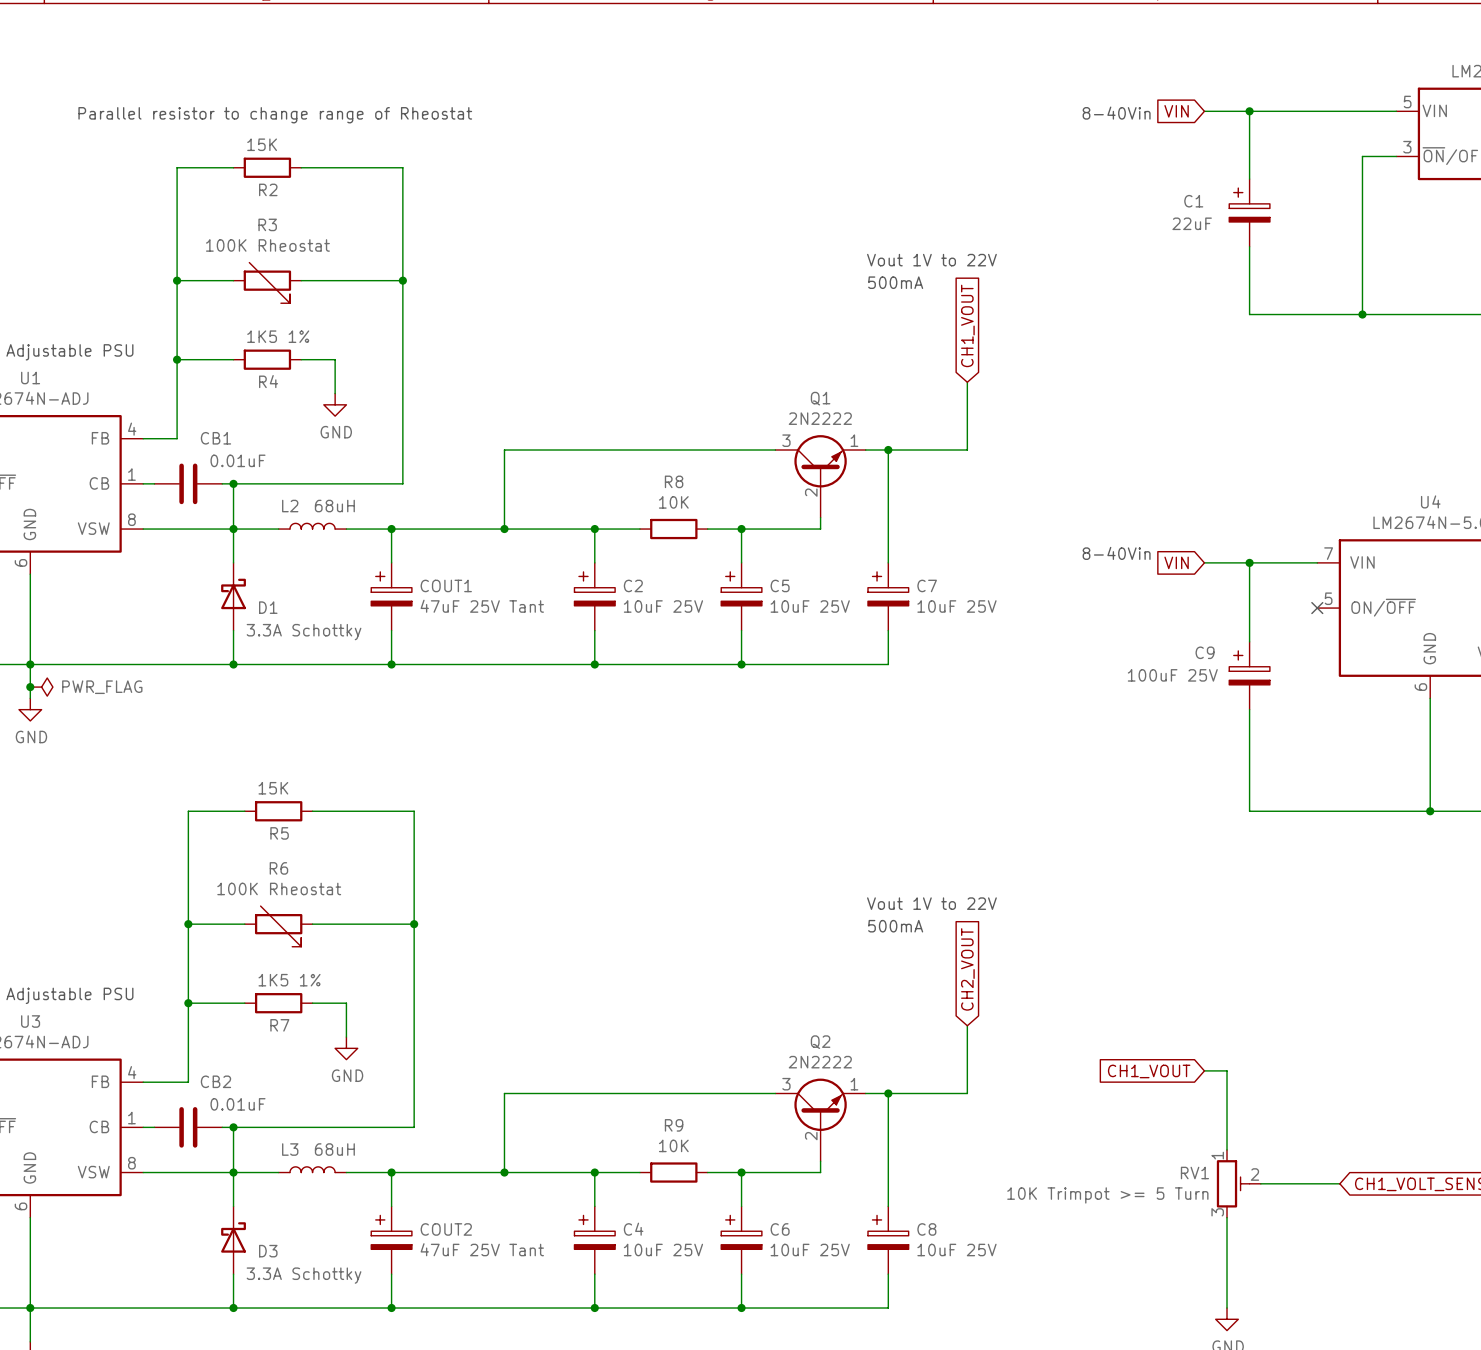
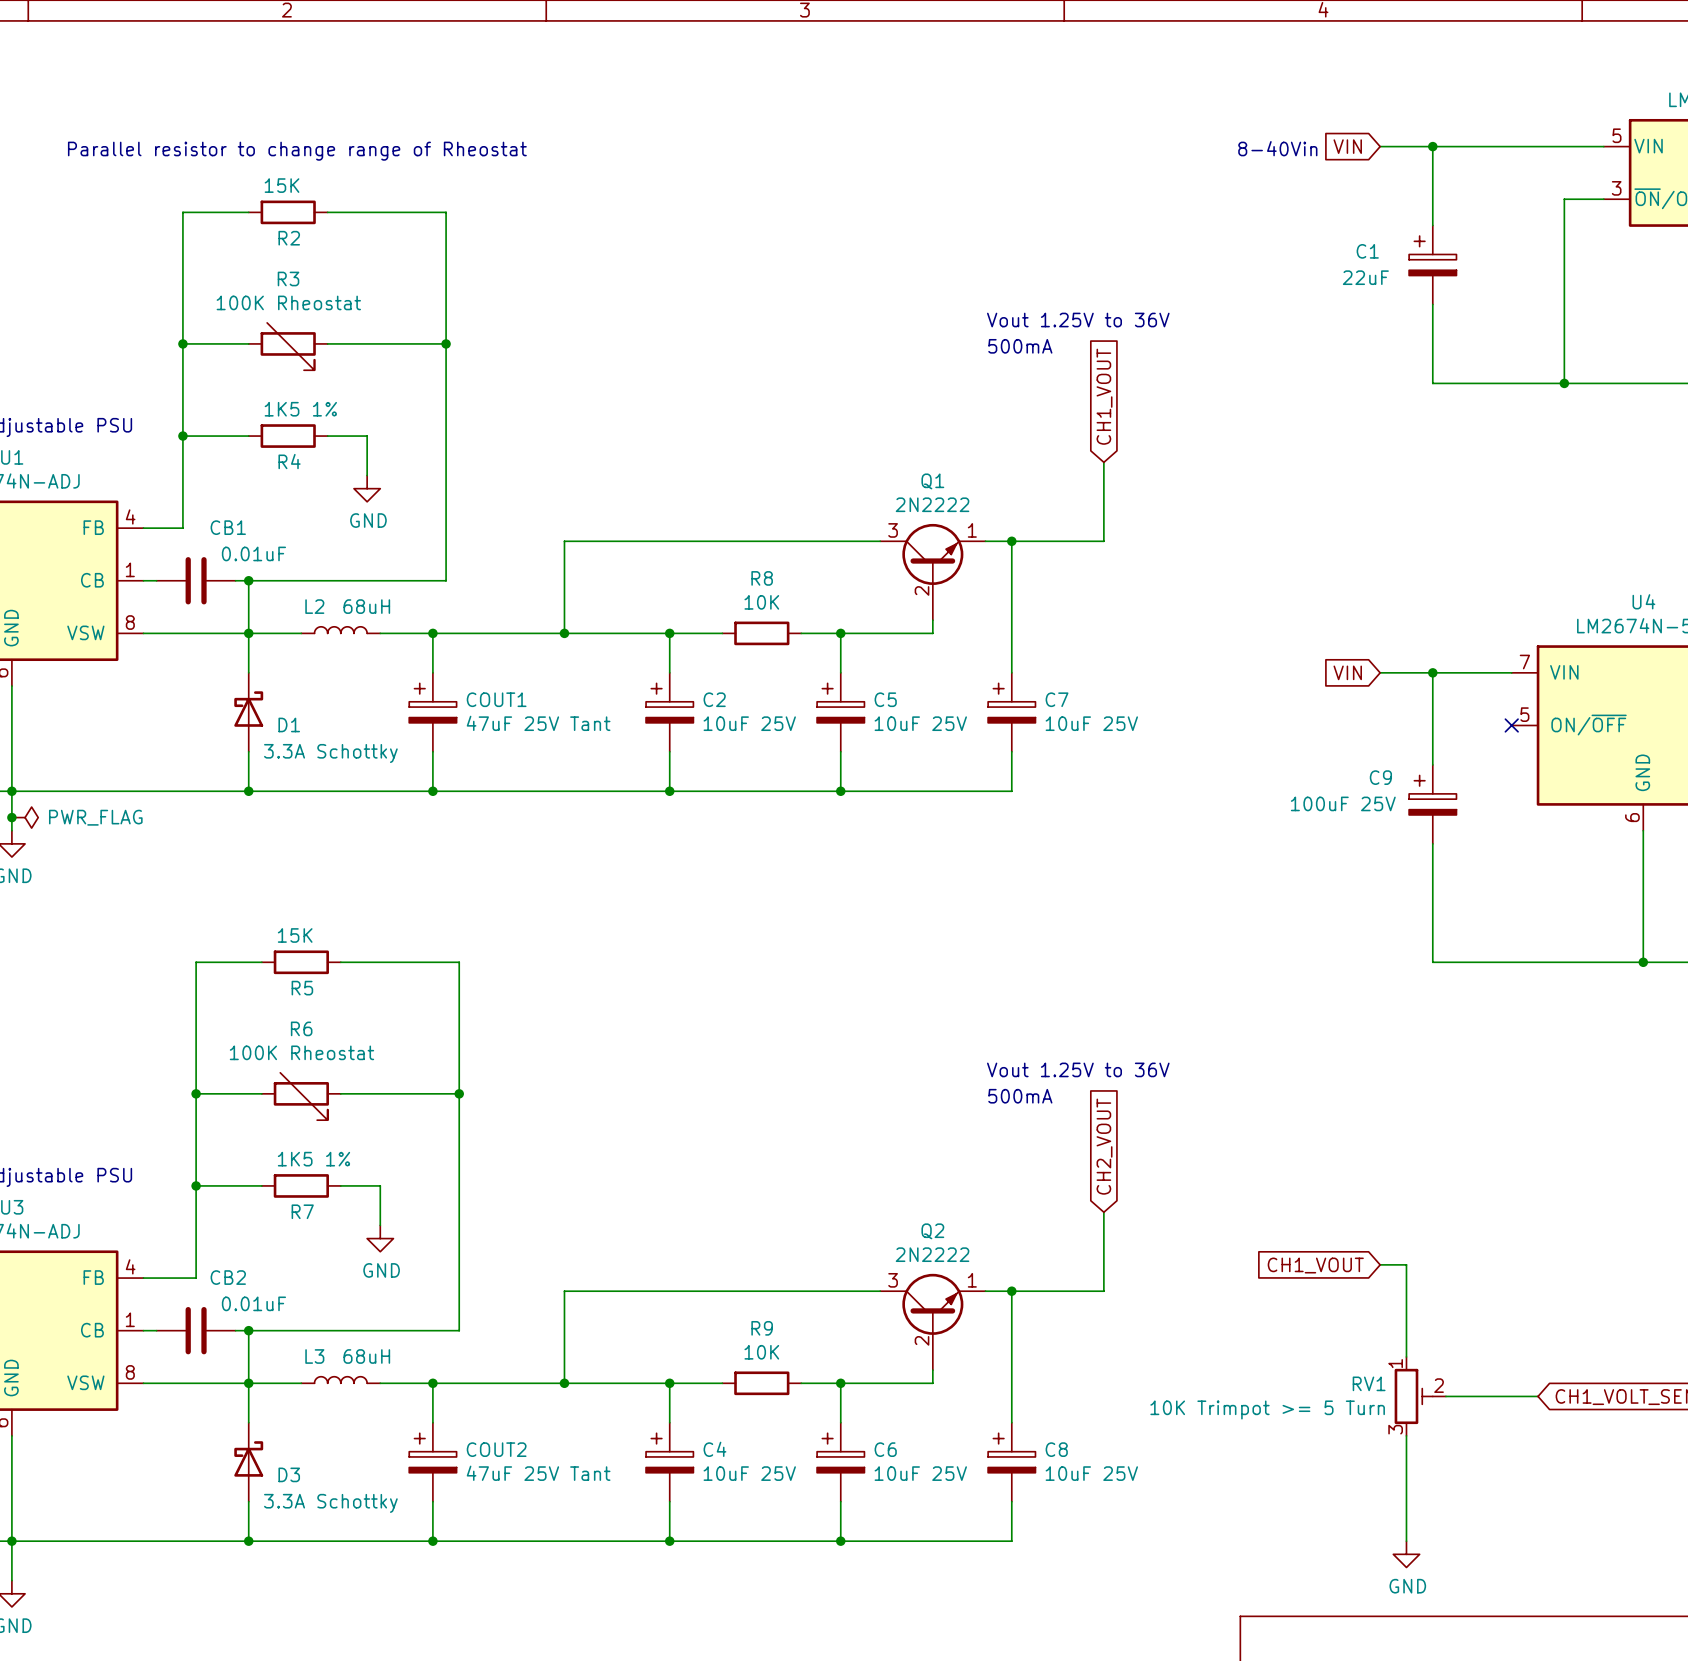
text: Vout 1V to 22V (931, 260) -> Vout 1.25V to 36V (1078, 320)
text: 8-40Vin (1116, 553) -> none
text: Vout 1V to 22V (931, 903) -> Vout 1.25V to 36V (1078, 1069)

